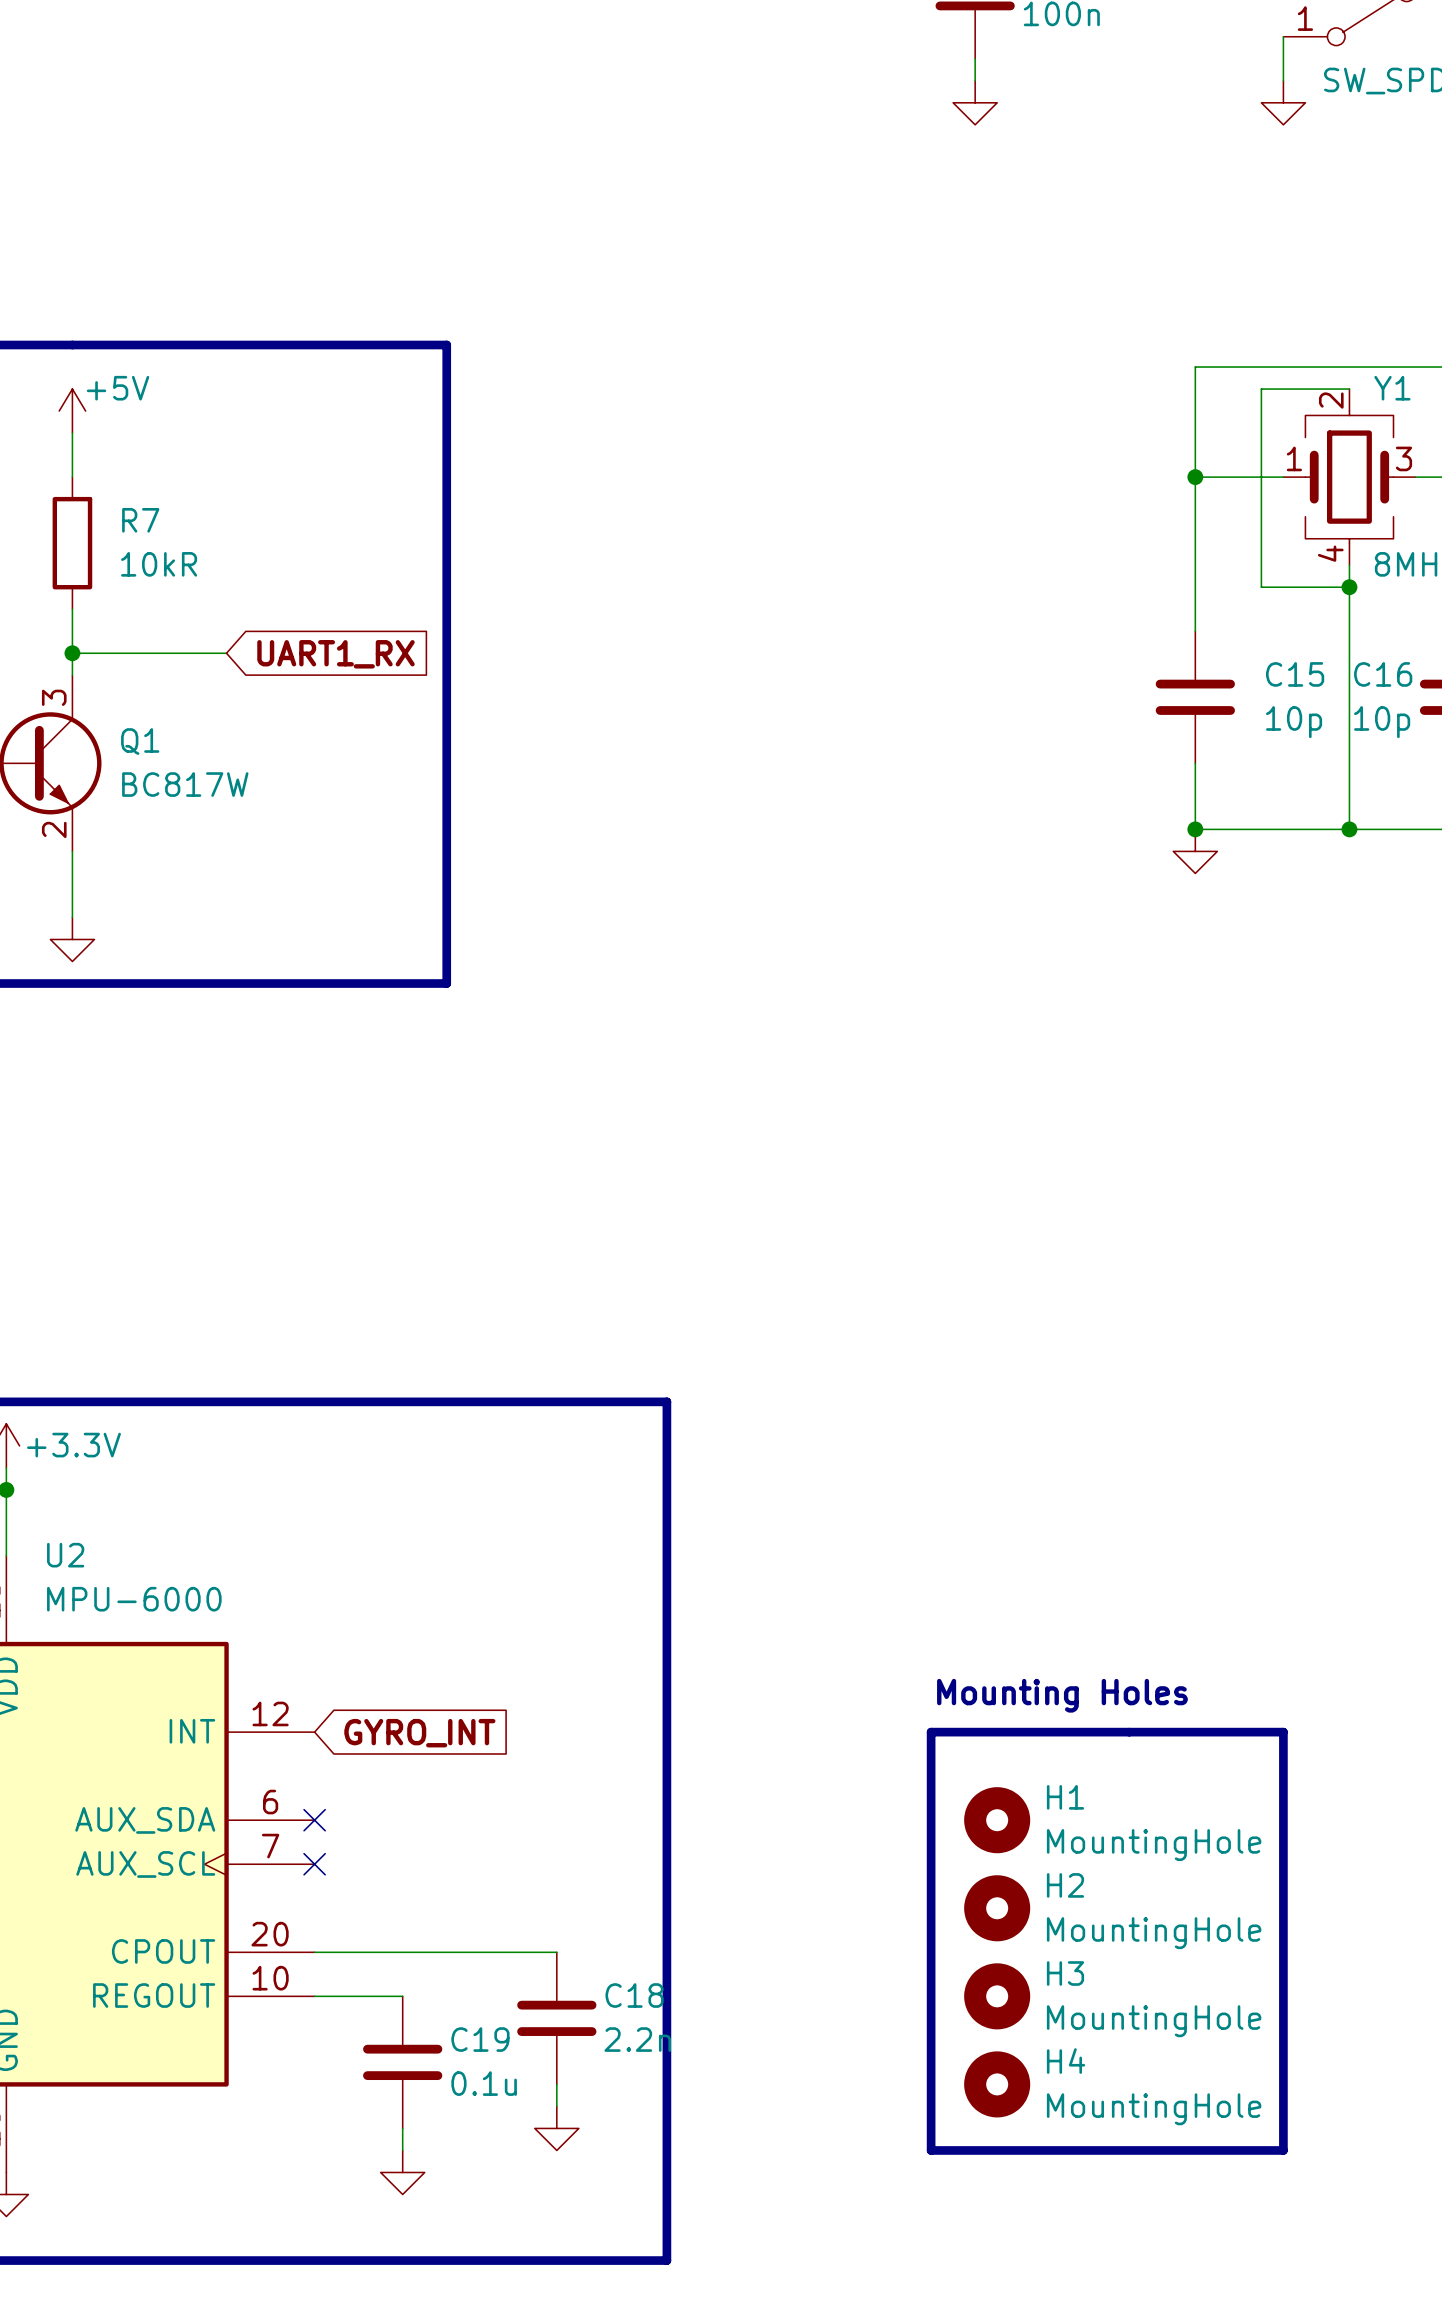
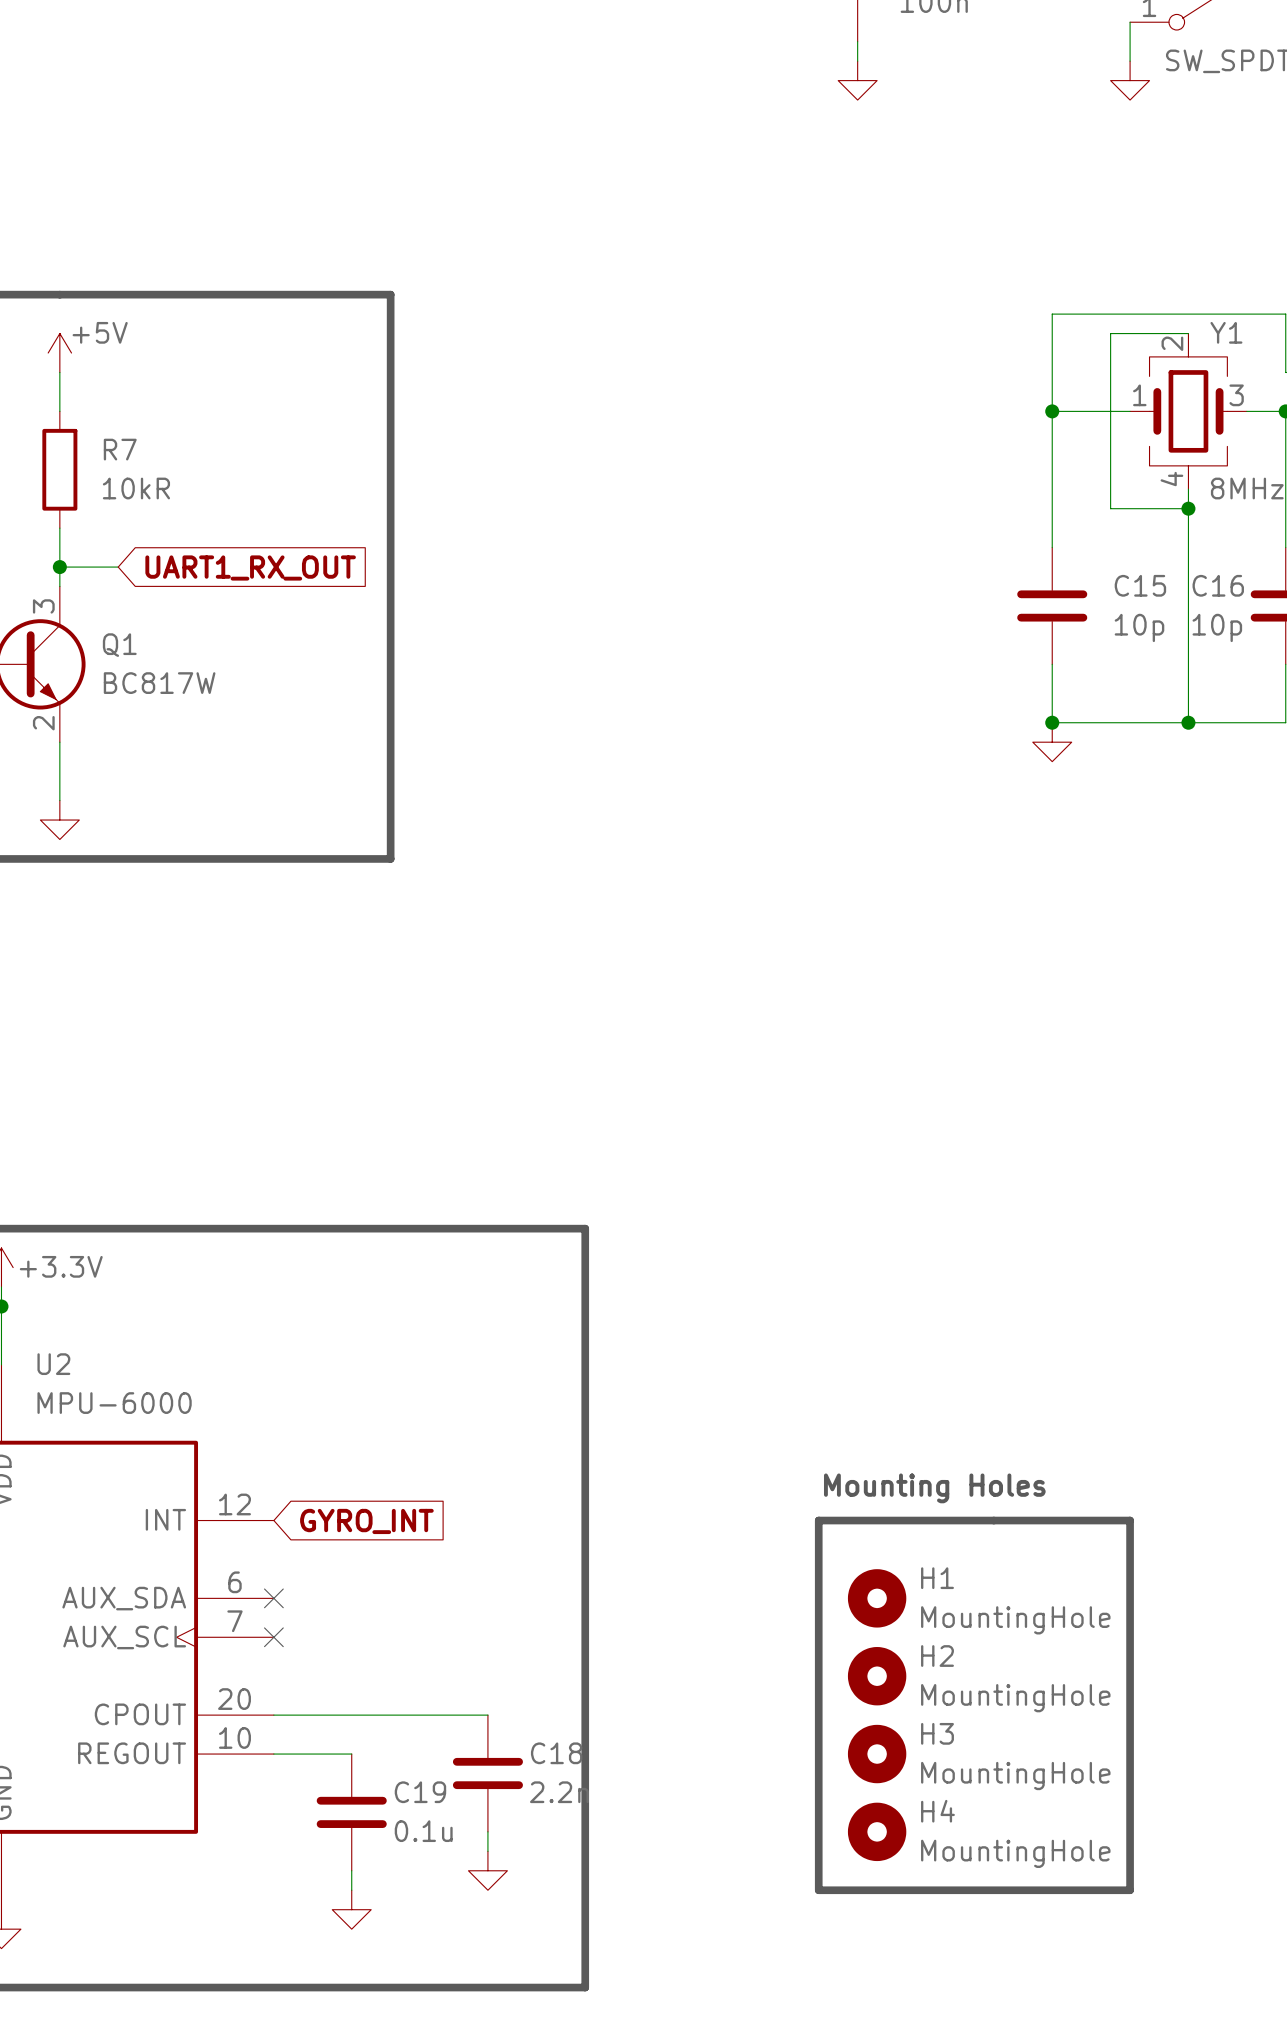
wire: (138, 653) (226, 653) -> none
global label: UART1_RX (336, 654) -> UART1_RX_OUT (250, 567)

